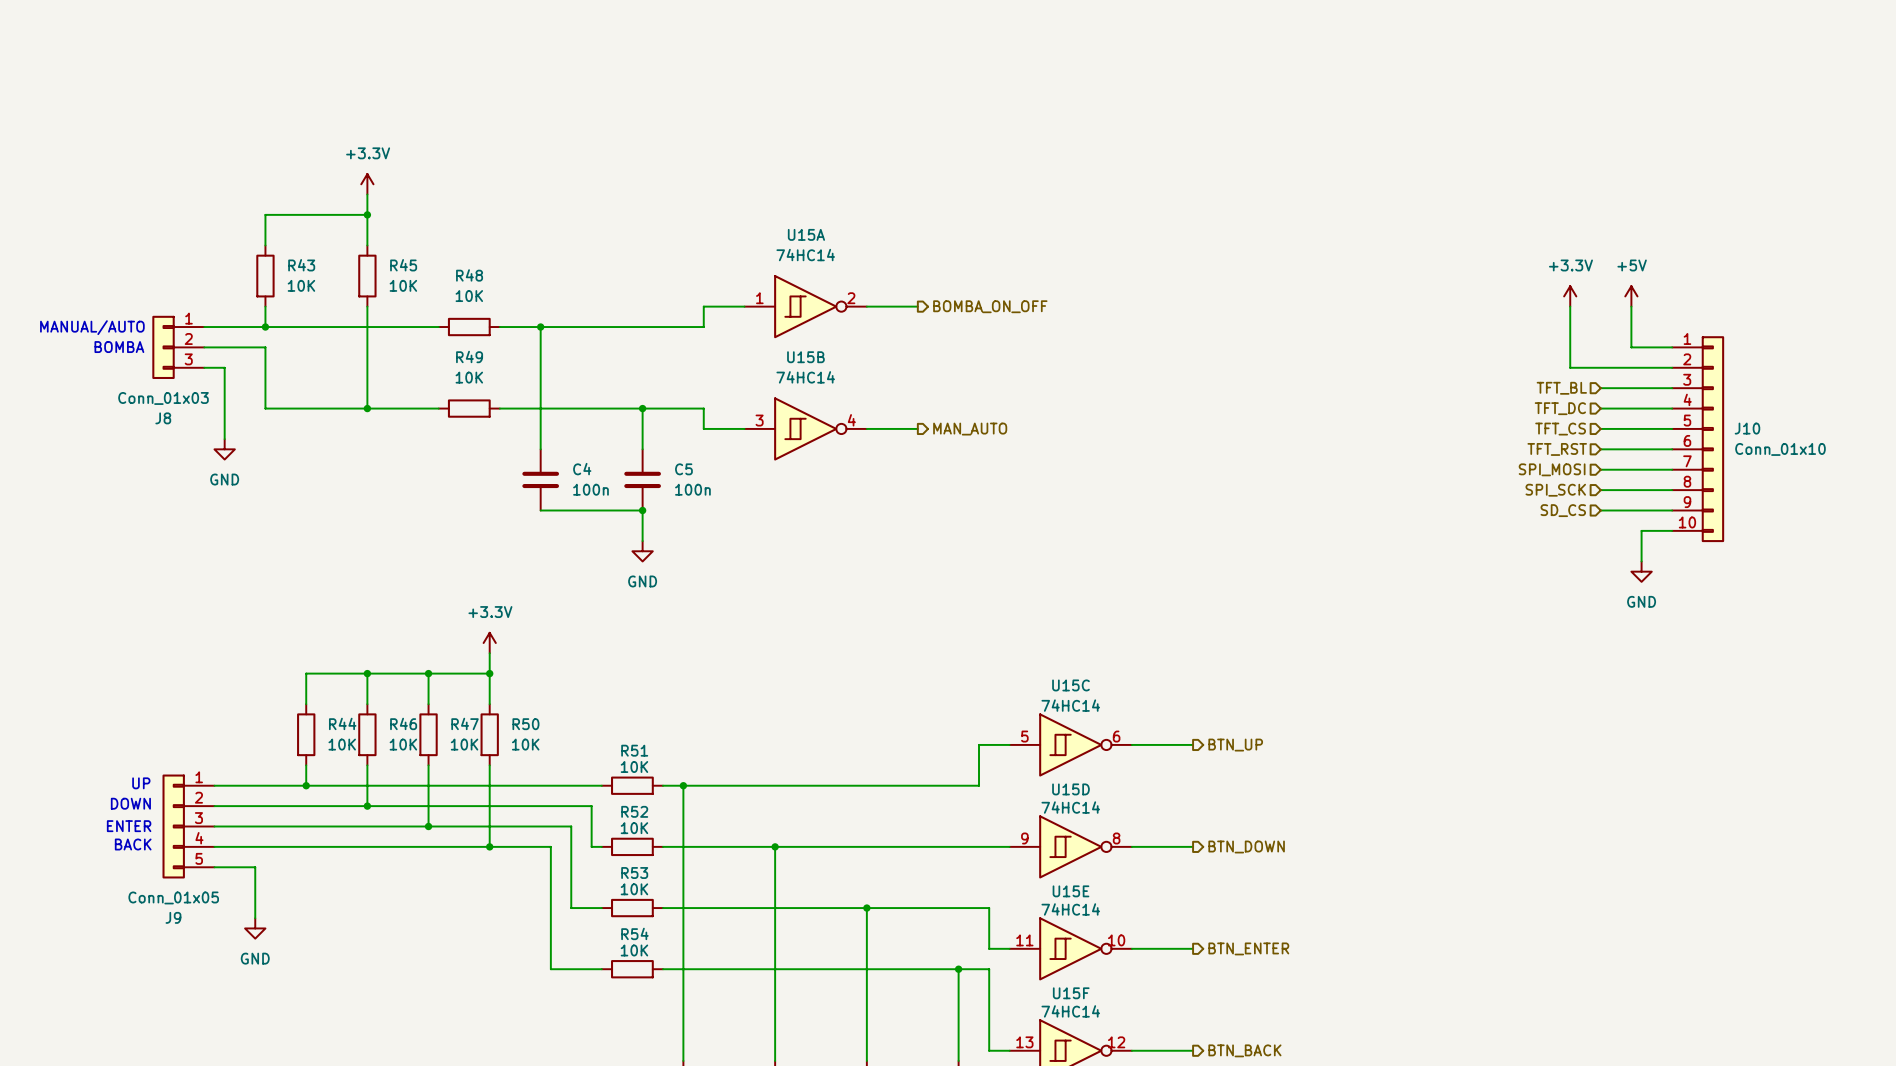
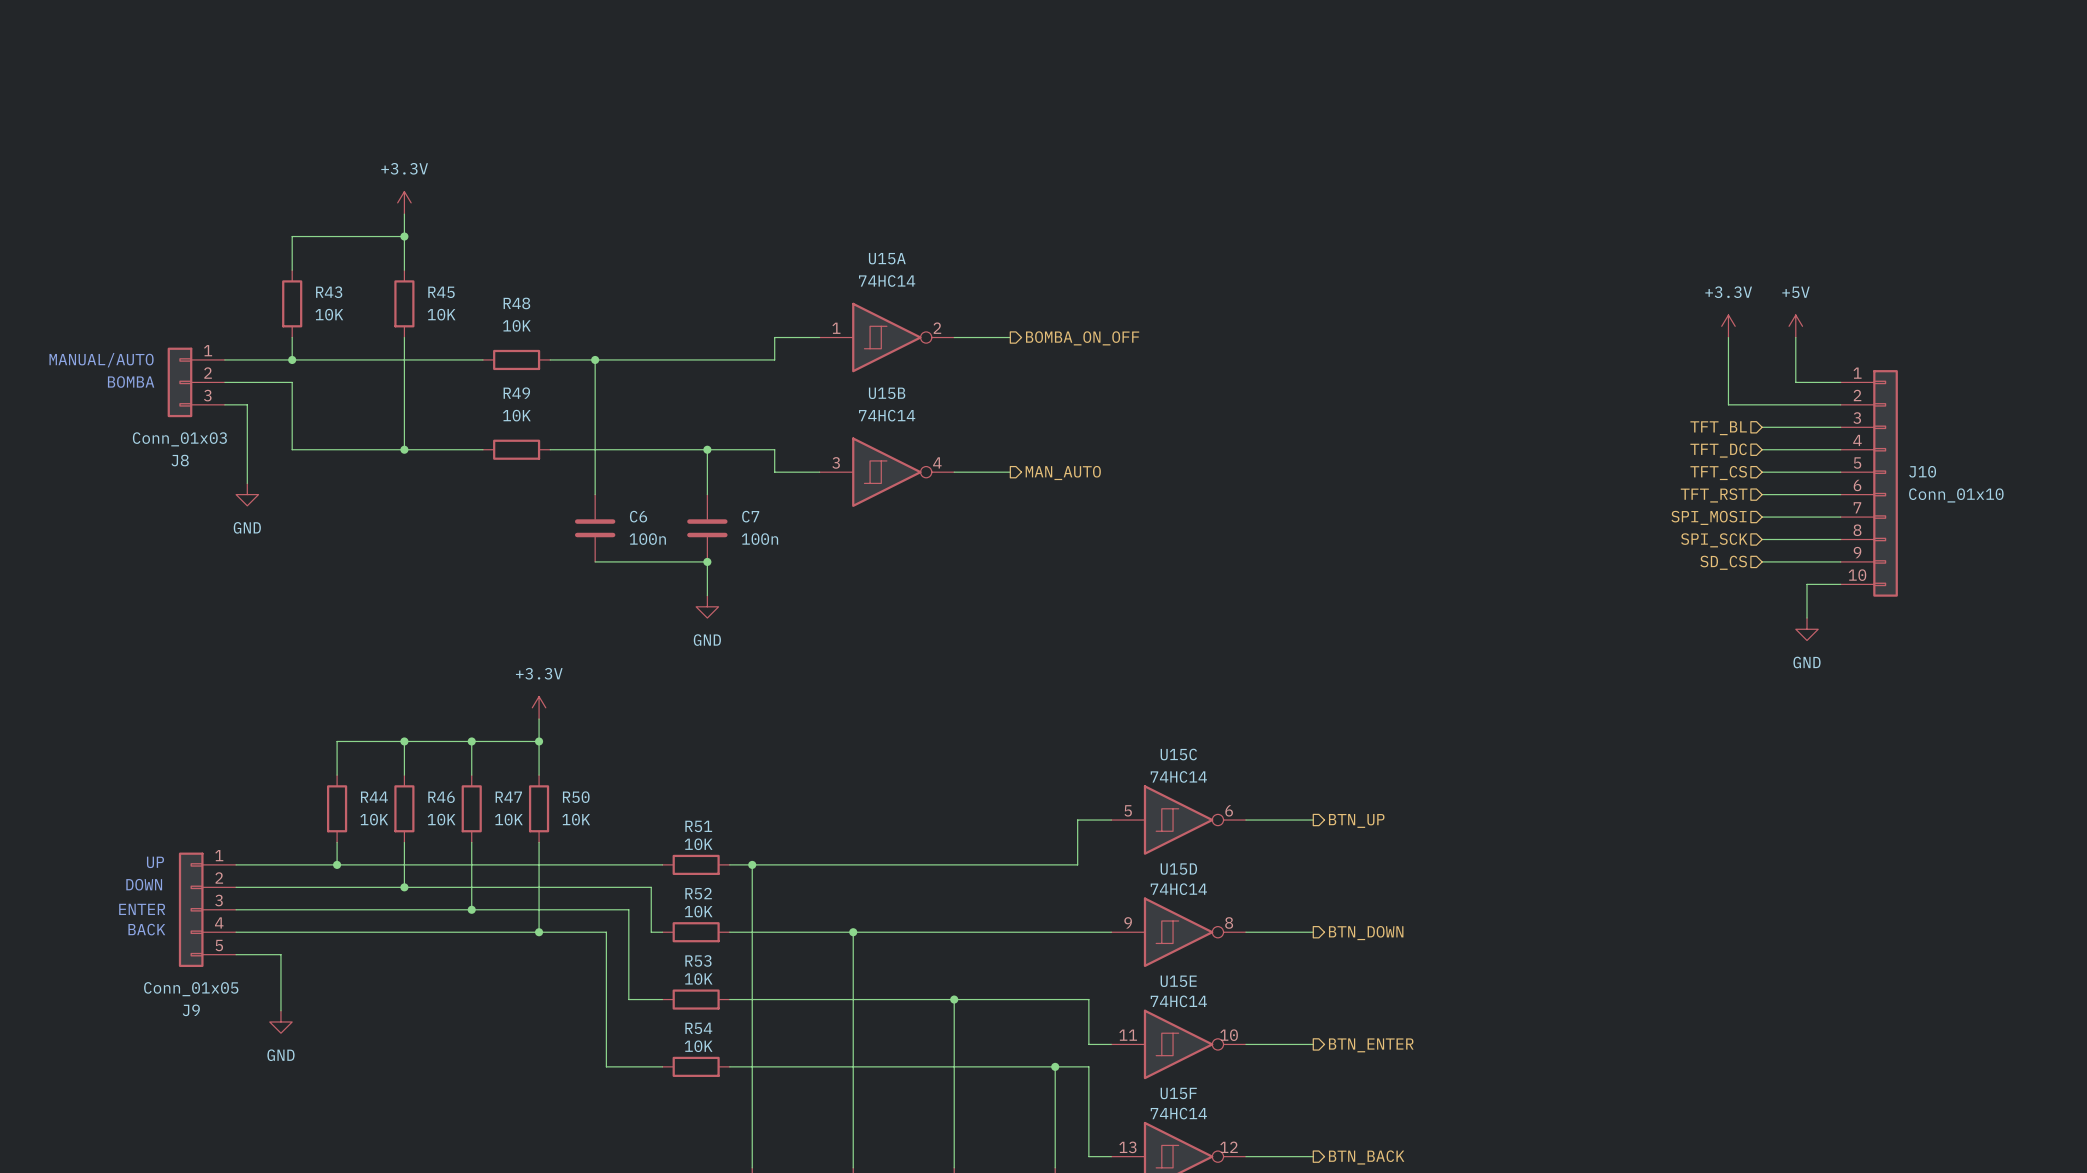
C4 name: C4 (582, 469) -> C6 (638, 516)
C5 name: C5 (683, 469) -> C7 (750, 516)

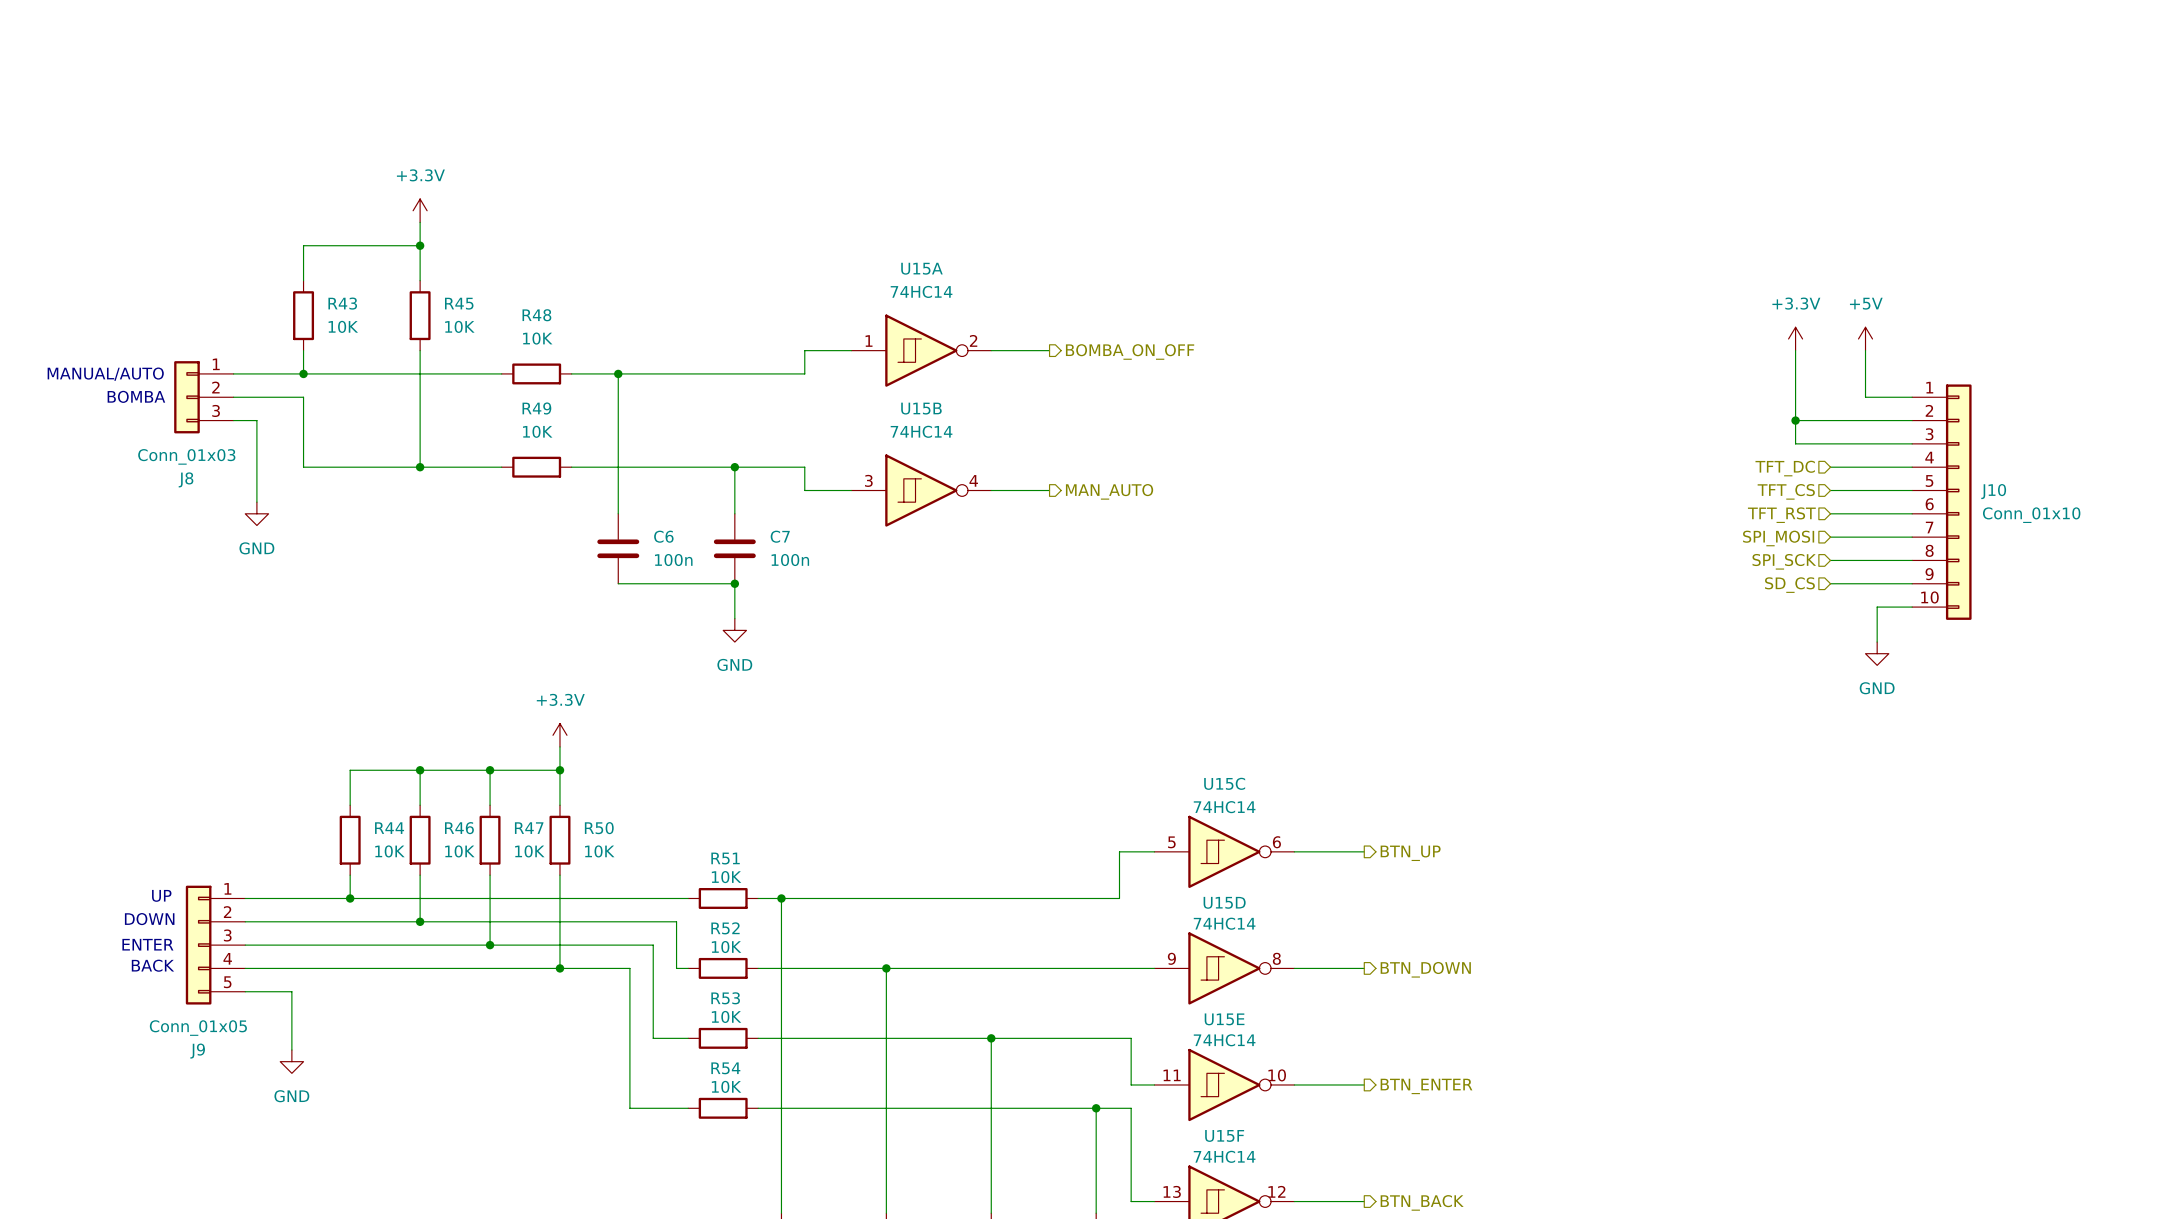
wire: none -> (1795, 420) (1795, 443) (1830, 443)
junction: none -> (1795, 420)
hierarchical label: TFT_BL (1718, 428) -> none

